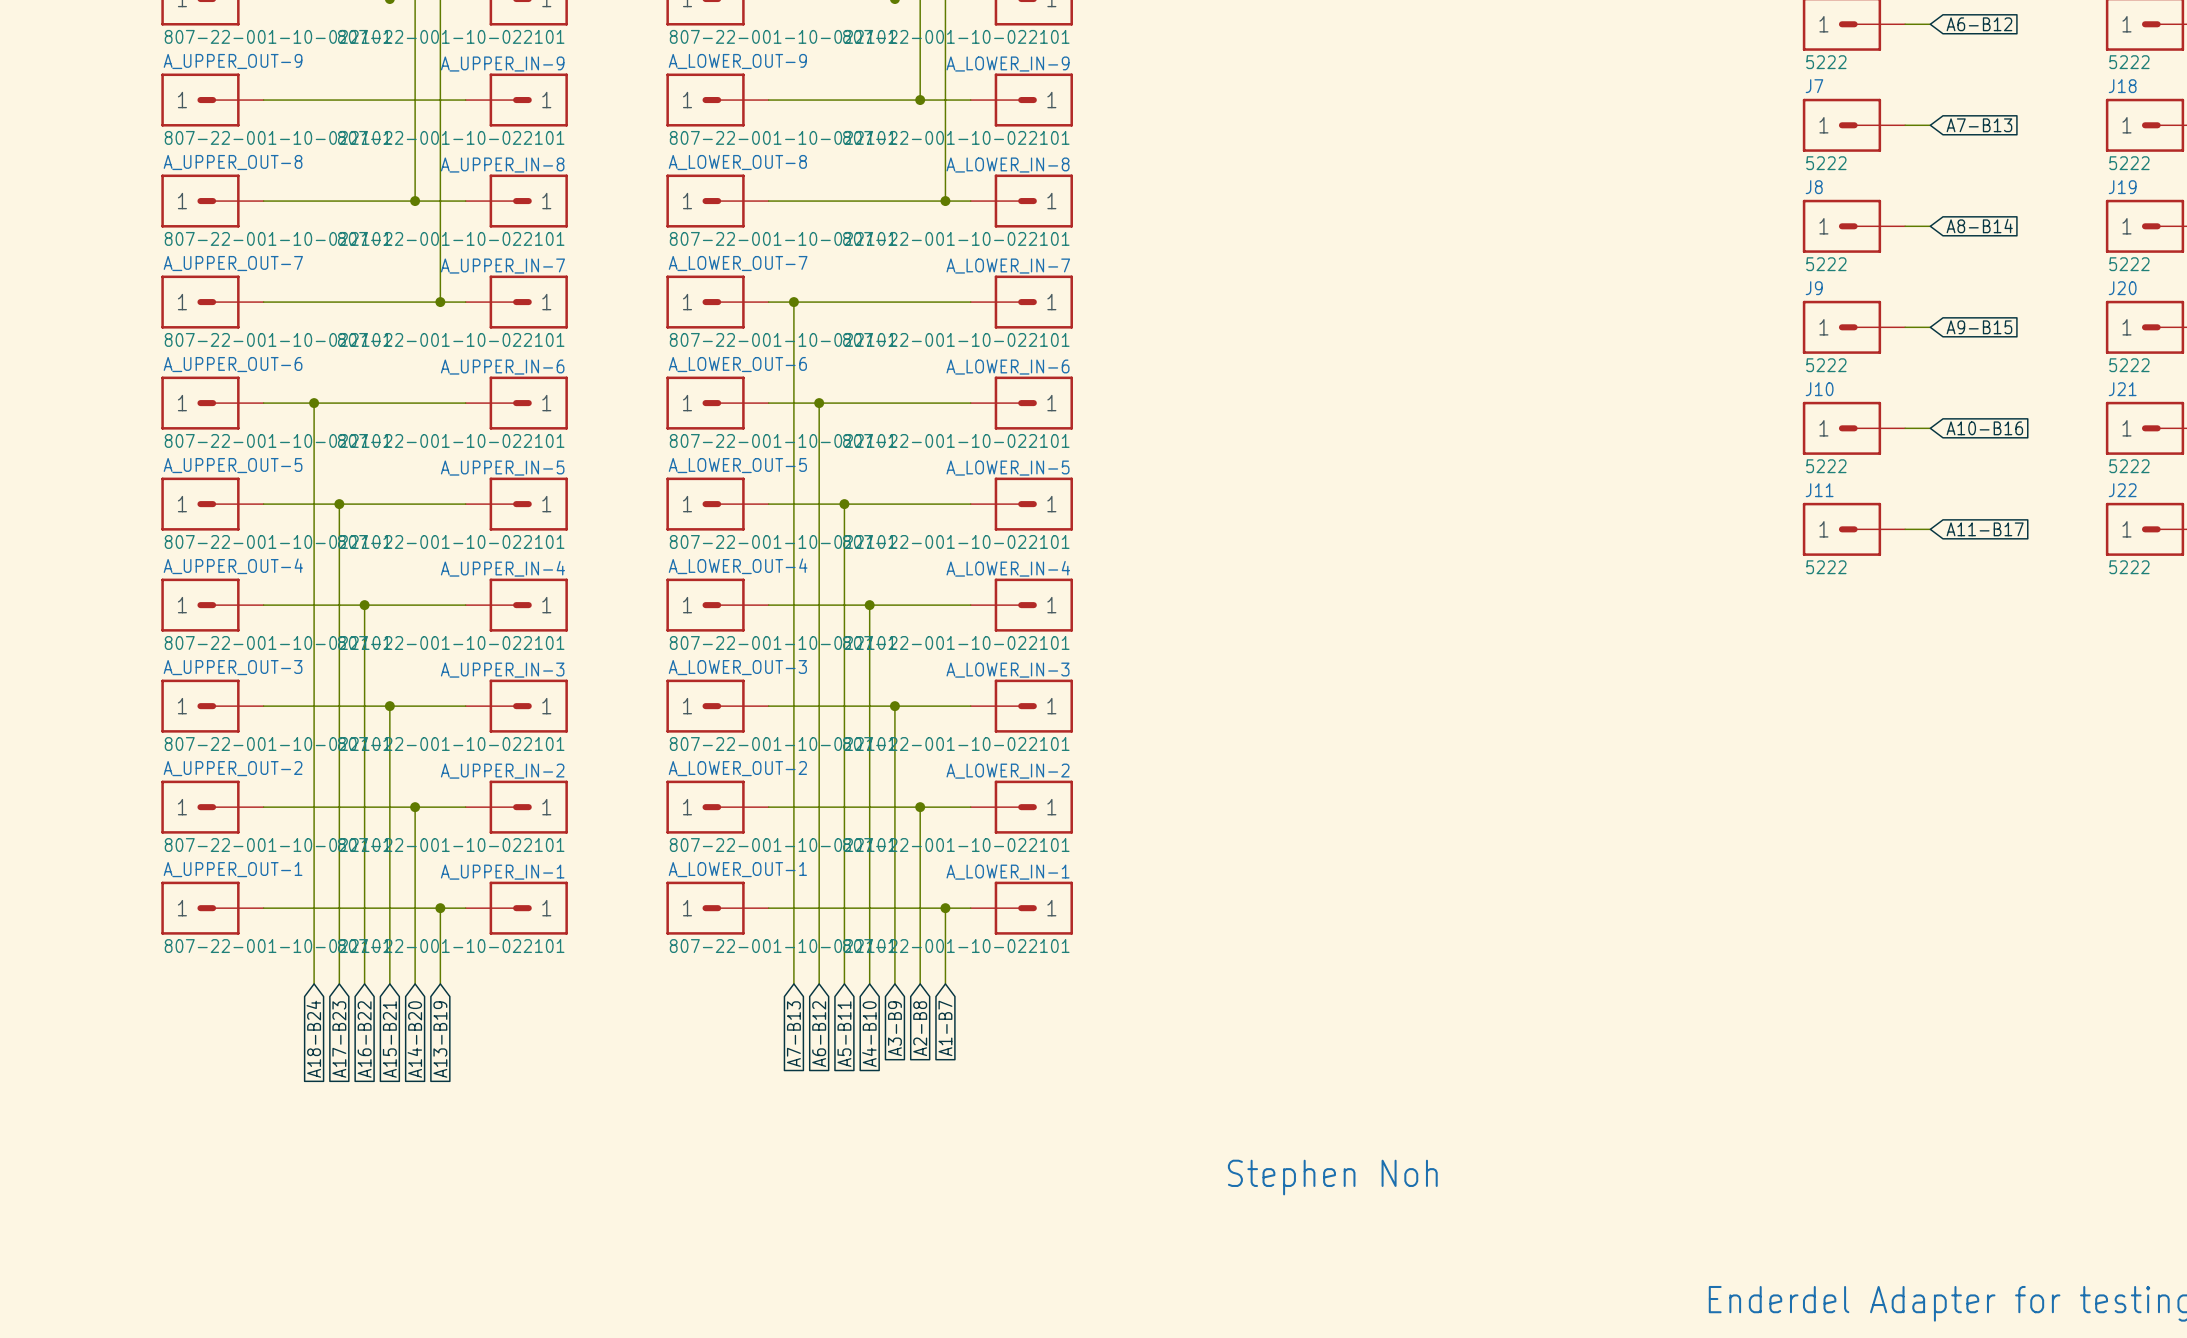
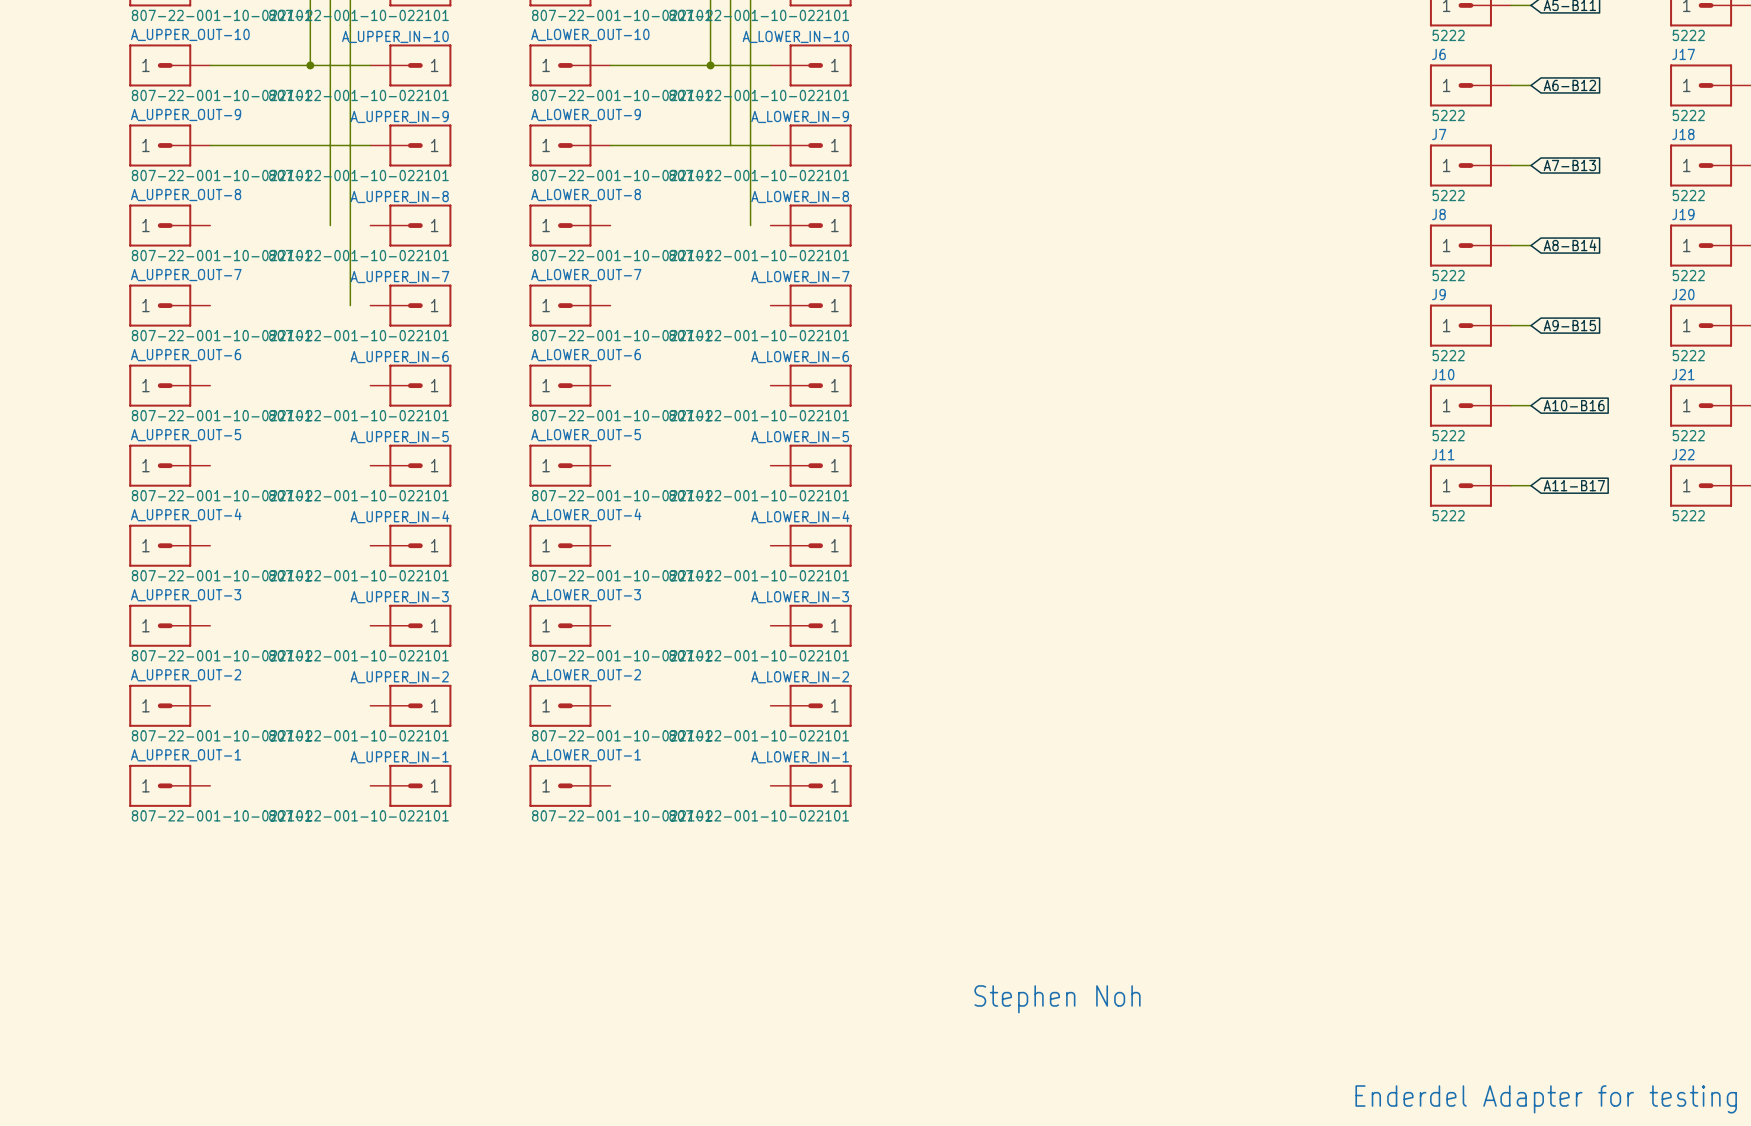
junction: (920, 100) -> none
wire: (263, 201) (465, 201) -> none
junction: (415, 201) -> none
wire: (768, 201) (970, 201) -> none
junction: (945, 201) -> none
wire: (263, 302) (465, 302) -> none
junction: (440, 302) -> none
wire: (768, 302) (970, 302) -> none
wire: (793, 302) (793, 983) -> none
junction: (793, 302) -> none
wire: (263, 403) (465, 403) -> none
wire: (314, 403) (314, 983) -> none
junction: (314, 403) -> none
wire: (768, 403) (970, 403) -> none
wire: (819, 403) (819, 983) -> none
junction: (819, 403) -> none
wire: (263, 504) (465, 504) -> none
wire: (339, 504) (339, 983) -> none
junction: (339, 504) -> none
wire: (768, 504) (970, 504) -> none
wire: (844, 504) (844, 983) -> none
junction: (844, 504) -> none
wire: (263, 605) (465, 605) -> none
wire: (364, 605) (364, 983) -> none
junction: (364, 605) -> none
wire: (768, 605) (970, 605) -> none
wire: (869, 605) (869, 983) -> none
junction: (869, 605) -> none
wire: (263, 706) (465, 706) -> none
wire: (389, 706) (389, 983) -> none
junction: (389, 706) -> none
wire: (768, 706) (970, 706) -> none
wire: (894, 706) (894, 983) -> none
junction: (894, 706) -> none
wire: (263, 807) (465, 807) -> none
wire: (415, 807) (415, 983) -> none
junction: (415, 807) -> none
wire: (768, 807) (970, 807) -> none
wire: (920, 807) (920, 983) -> none
junction: (920, 807) -> none
wire: (263, 908) (465, 908) -> none
wire: (440, 908) (440, 983) -> none
junction: (440, 908) -> none
wire: (768, 908) (970, 908) -> none
wire: (945, 908) (945, 983) -> none
junction: (945, 908) -> none
global label: A3-B9 (894, 1028) -> none
global label: A2-B8 (920, 1028) -> none
global label: A1-B7 (945, 1028) -> none
global label: A7-B13 (793, 1034) -> none
global label: A6-B12 (819, 1034) -> none
global label: A5-B11 (844, 1034) -> none
global label: A4-B10 (869, 1034) -> none
global label: A18-B24 (313, 1039) -> none
global label: A17-B23 (339, 1039) -> none
global label: A16-B22 (364, 1039) -> none
global label: A15-B21 (389, 1039) -> none
global label: A14-B20 (414, 1039) -> none
global label: A13-B19 (440, 1039) -> none

